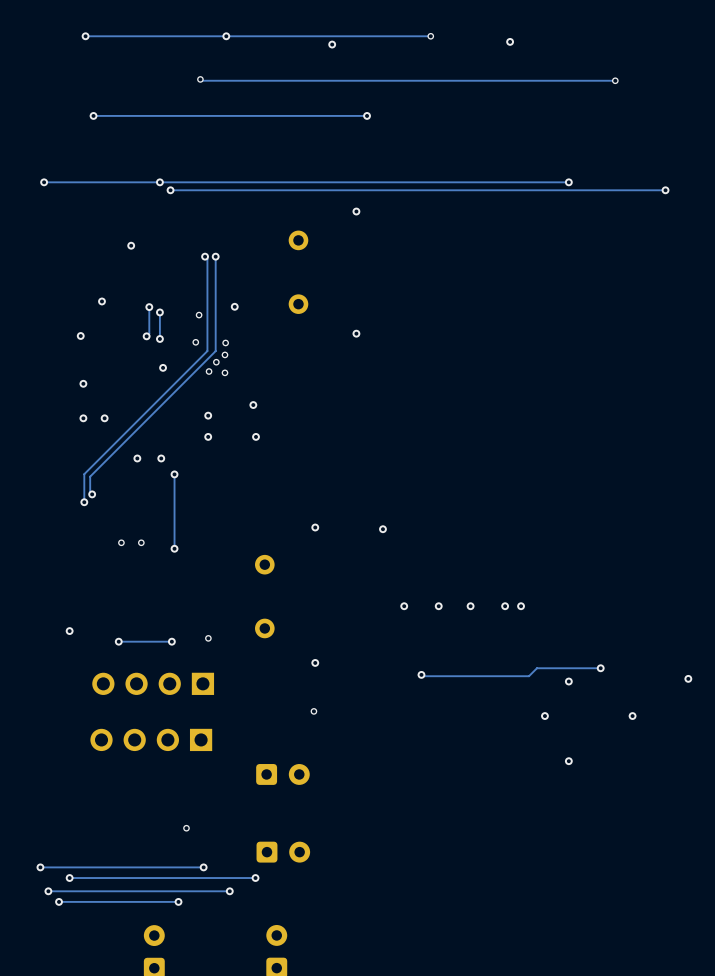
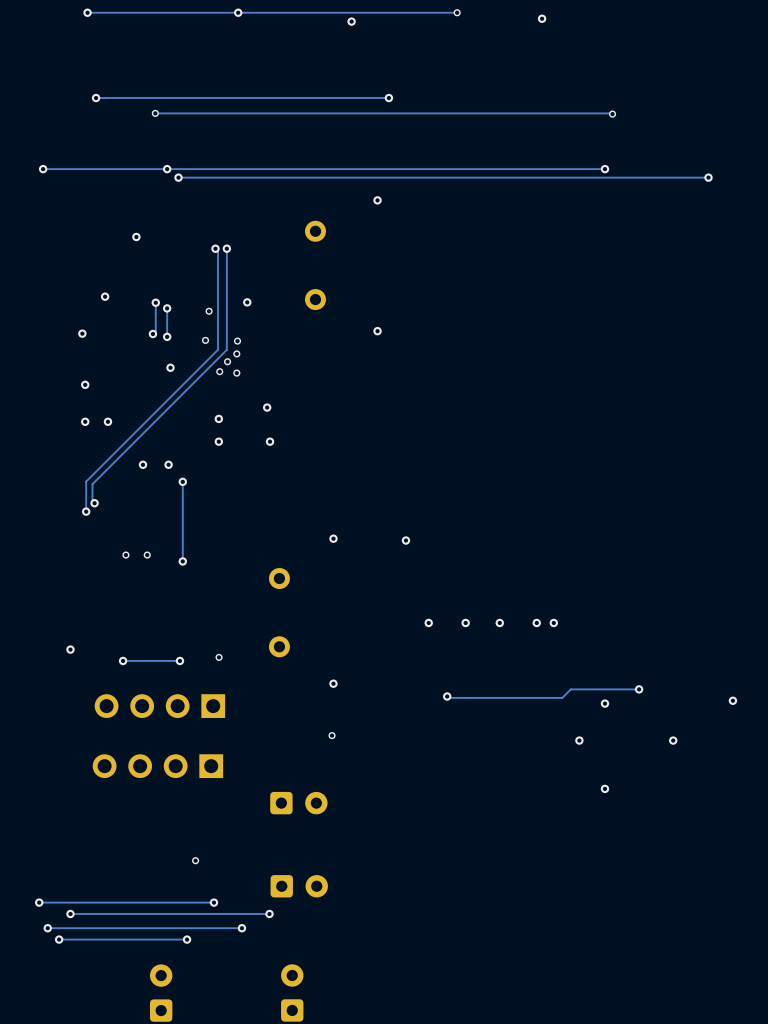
track: (200, 79) (615, 80) -> none
via position: (200, 79) -> (155, 113)
via position: (615, 80) -> (612, 114)
track: none -> (155, 113) (612, 114)

